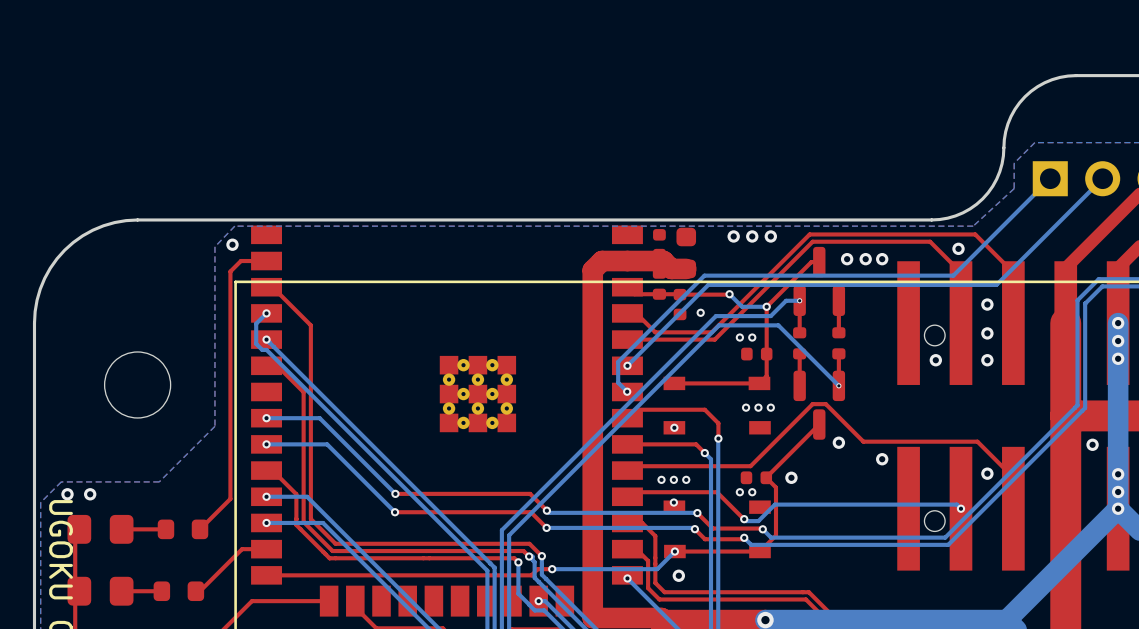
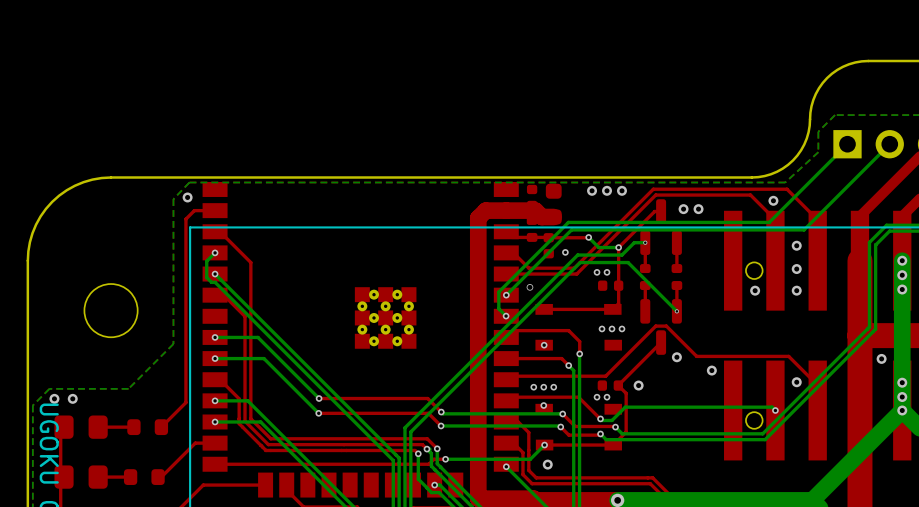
via: (882, 259) -> none
via: none -> (529, 287)

